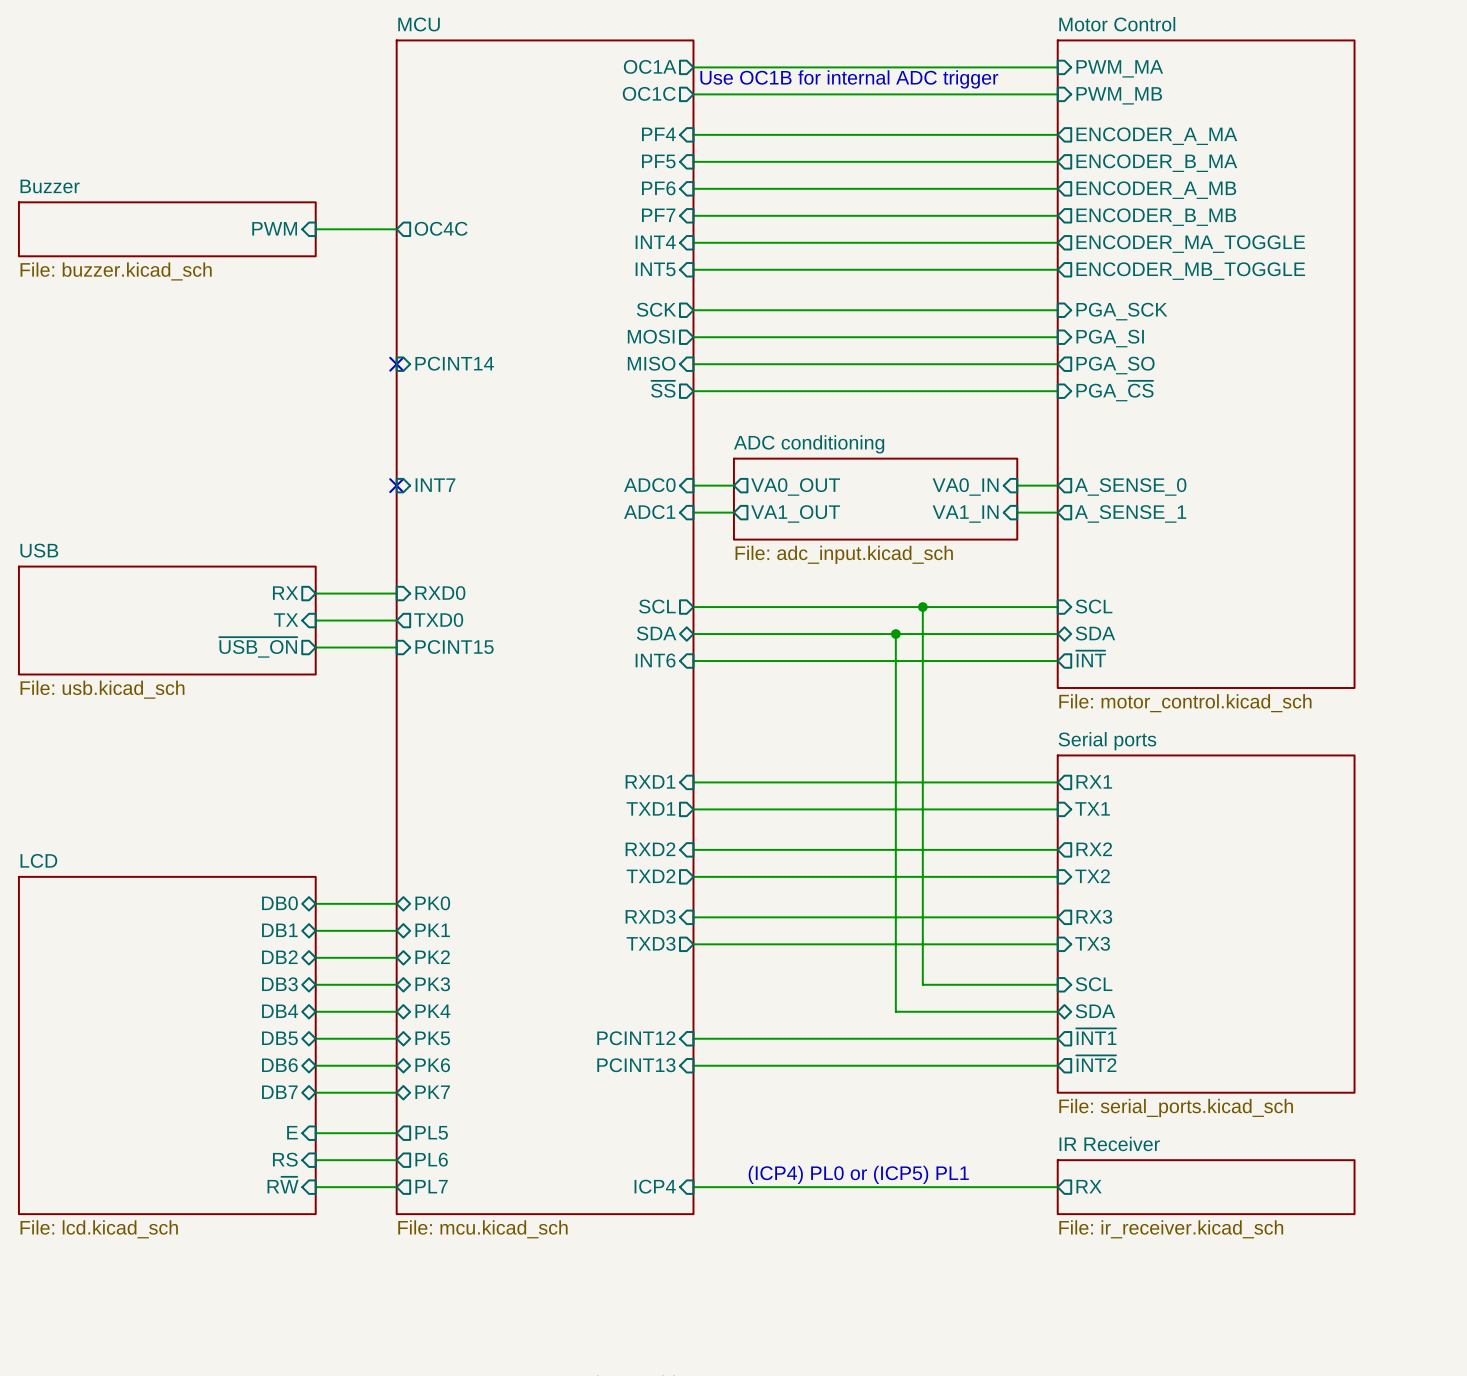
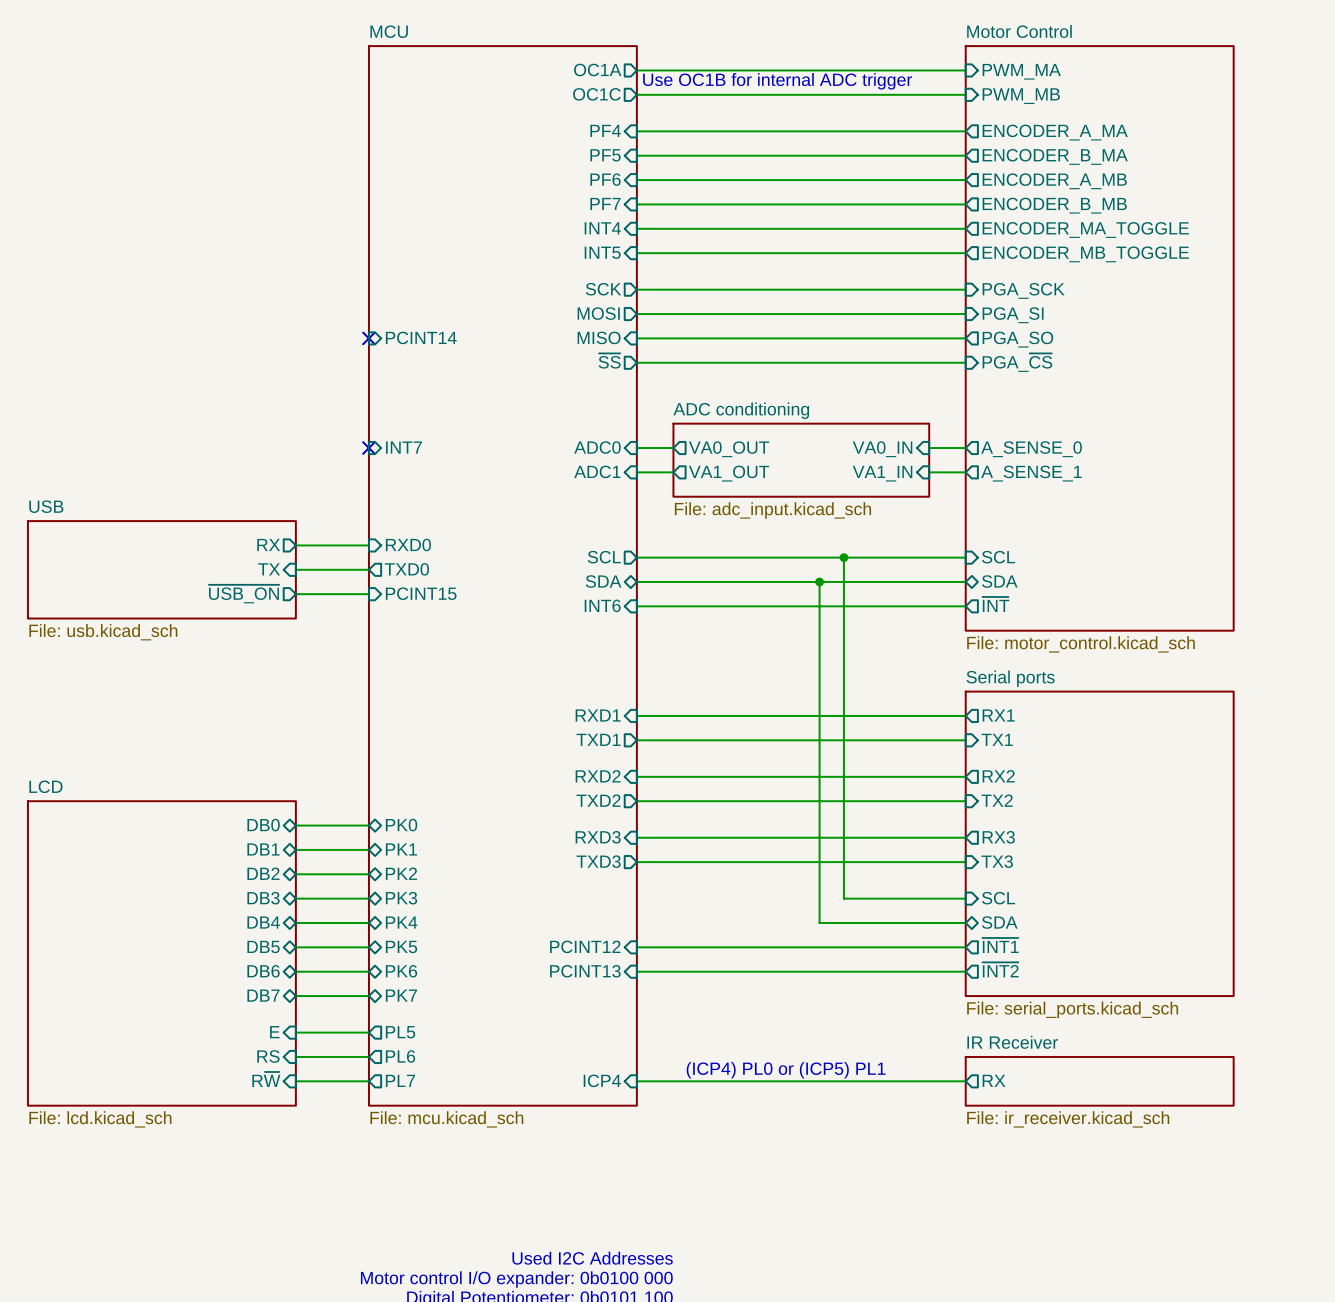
sheet pin: PWM (274, 228) -> none
sheet pin: OC4C (441, 228) -> none
sheet Buzzer: File: buzzer.kicad_sch (167, 229) -> none
wire: (315, 229) (396, 229) -> none

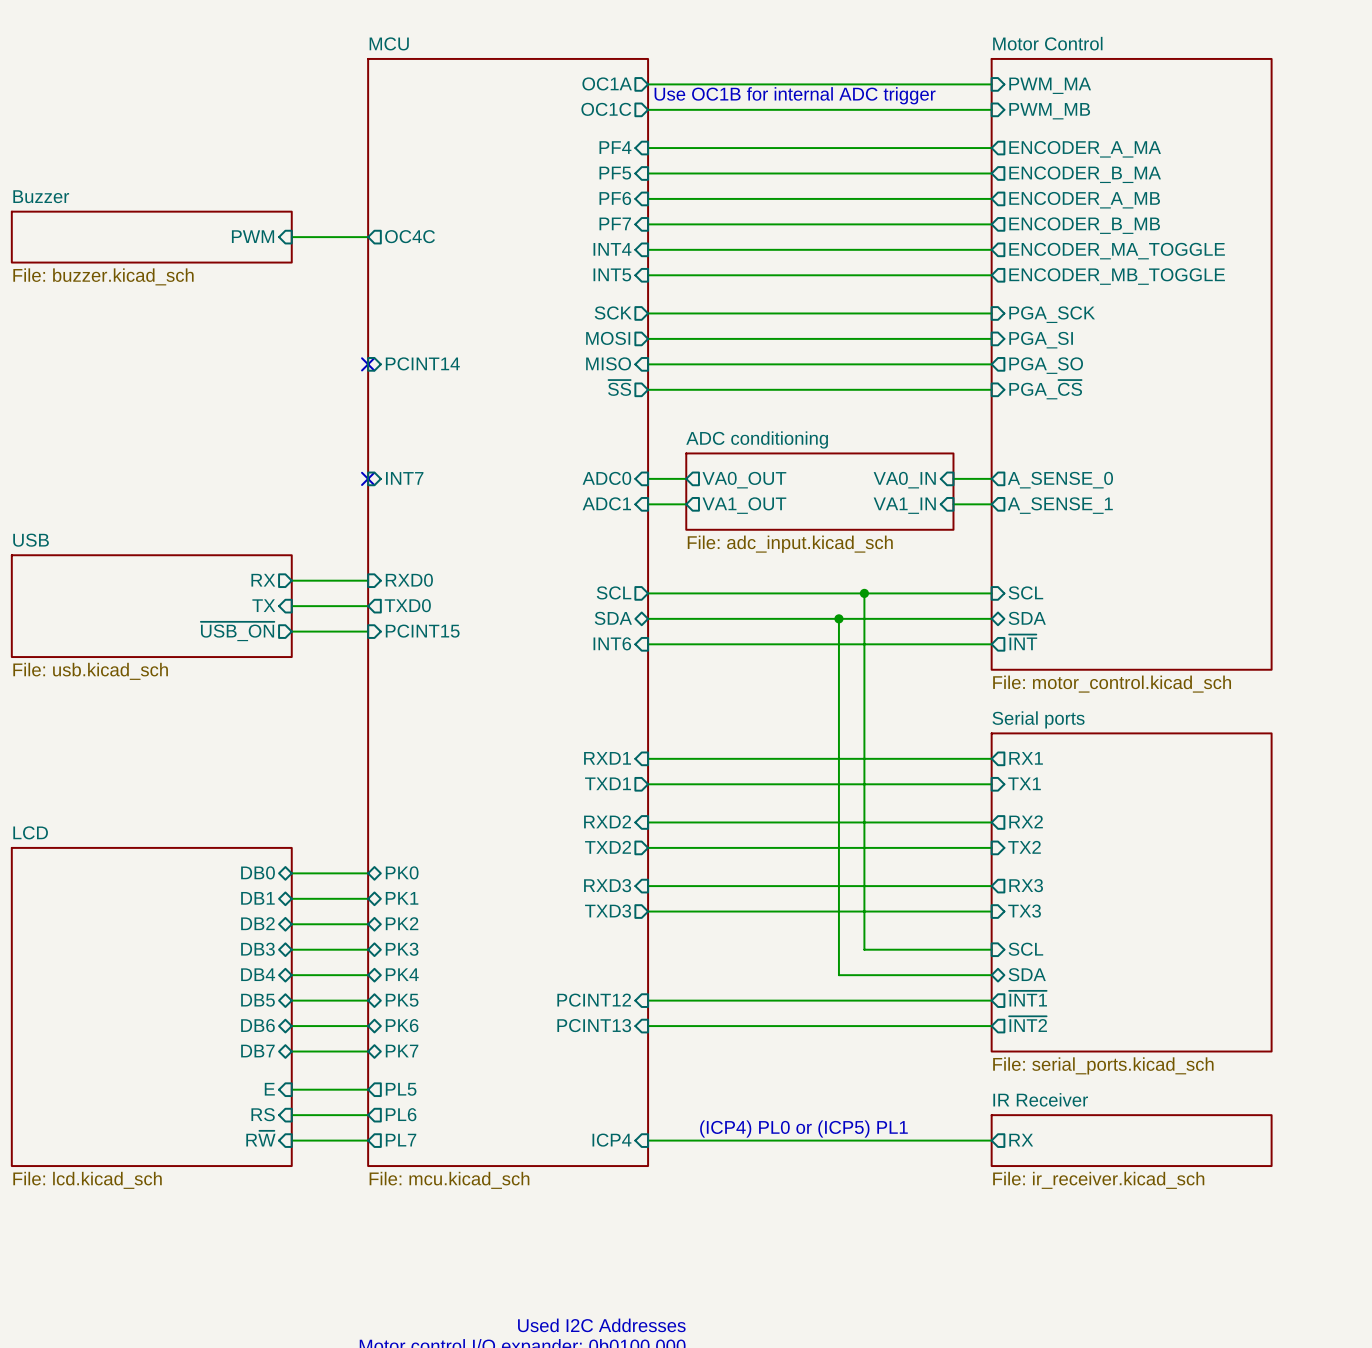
sheet Buzzer: none -> File: buzzer.kicad_sch (151, 237)
sheet pin: none -> PWM (253, 236)
wire: none -> (291, 237) (368, 237)
sheet pin: none -> OC4C (410, 236)

